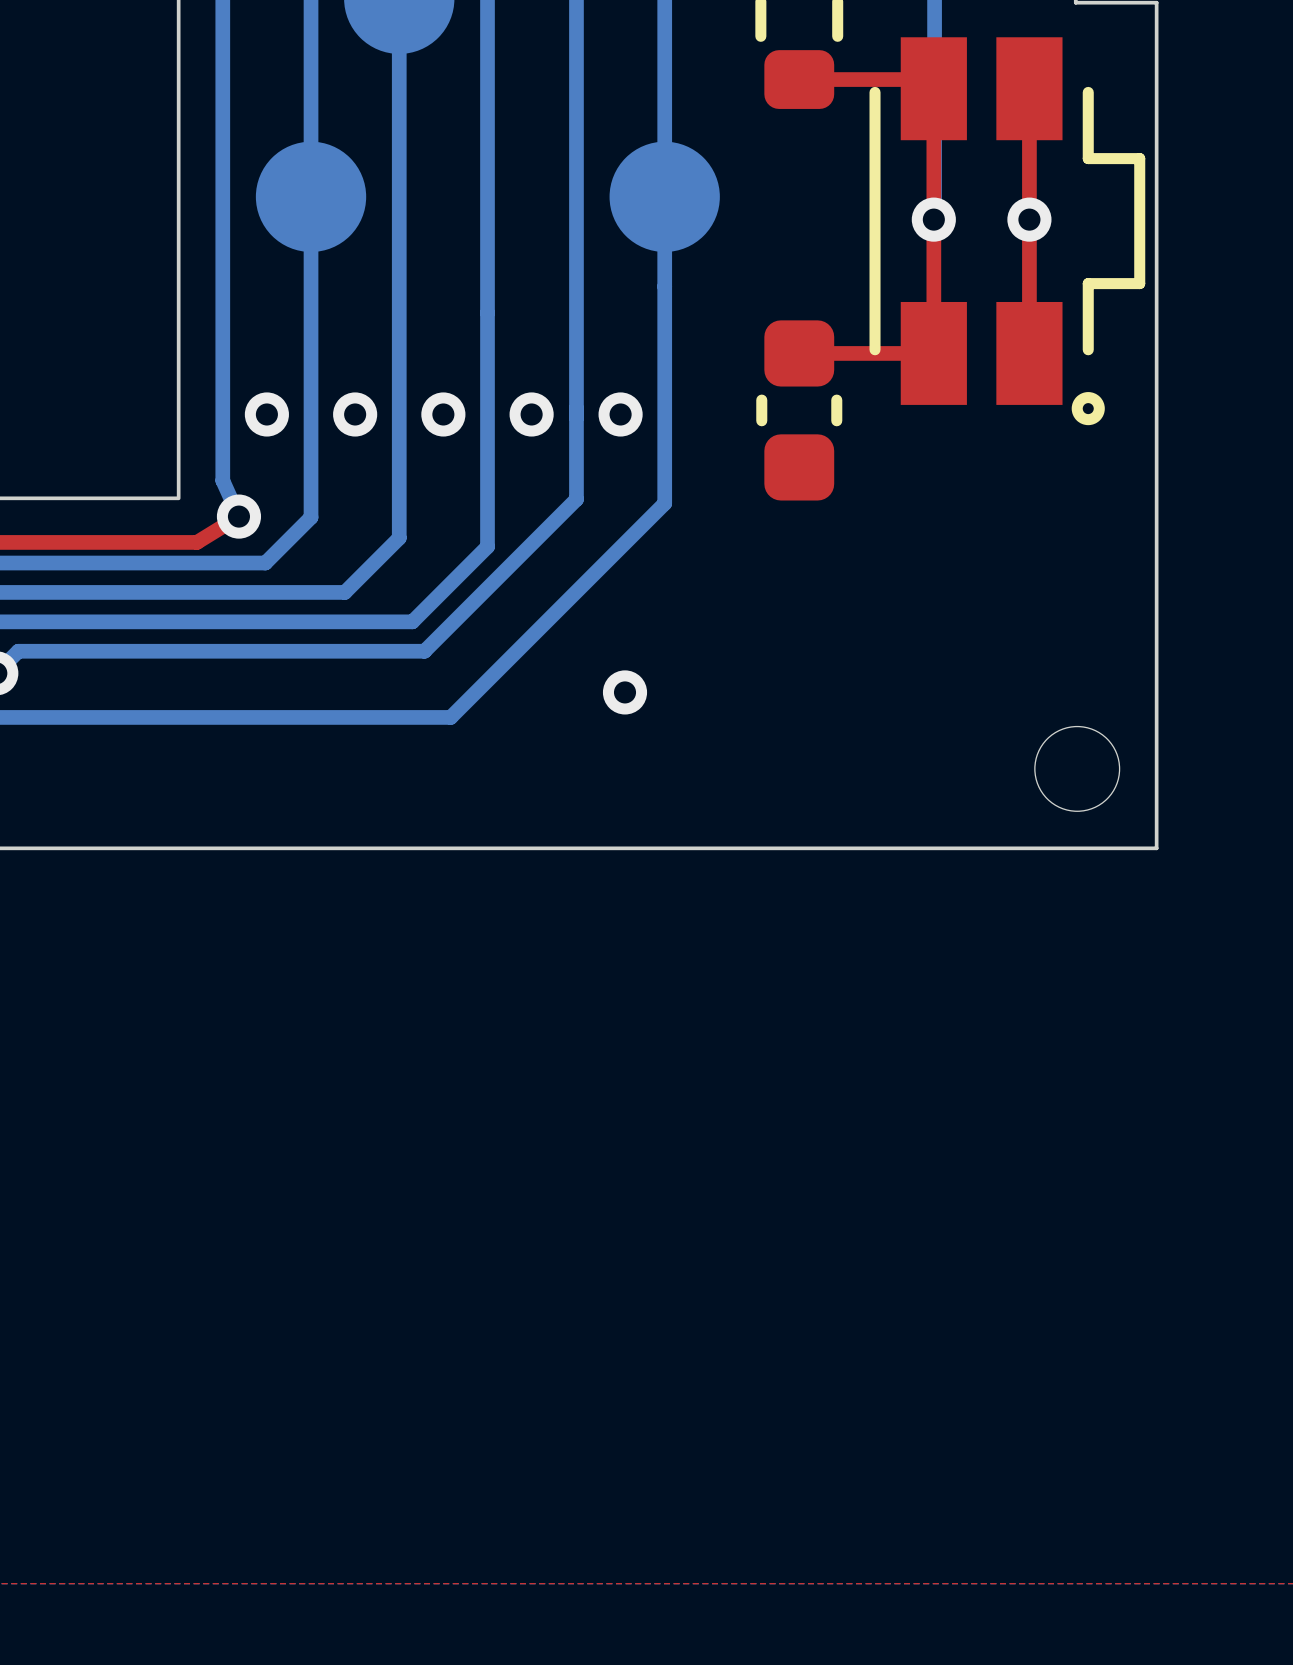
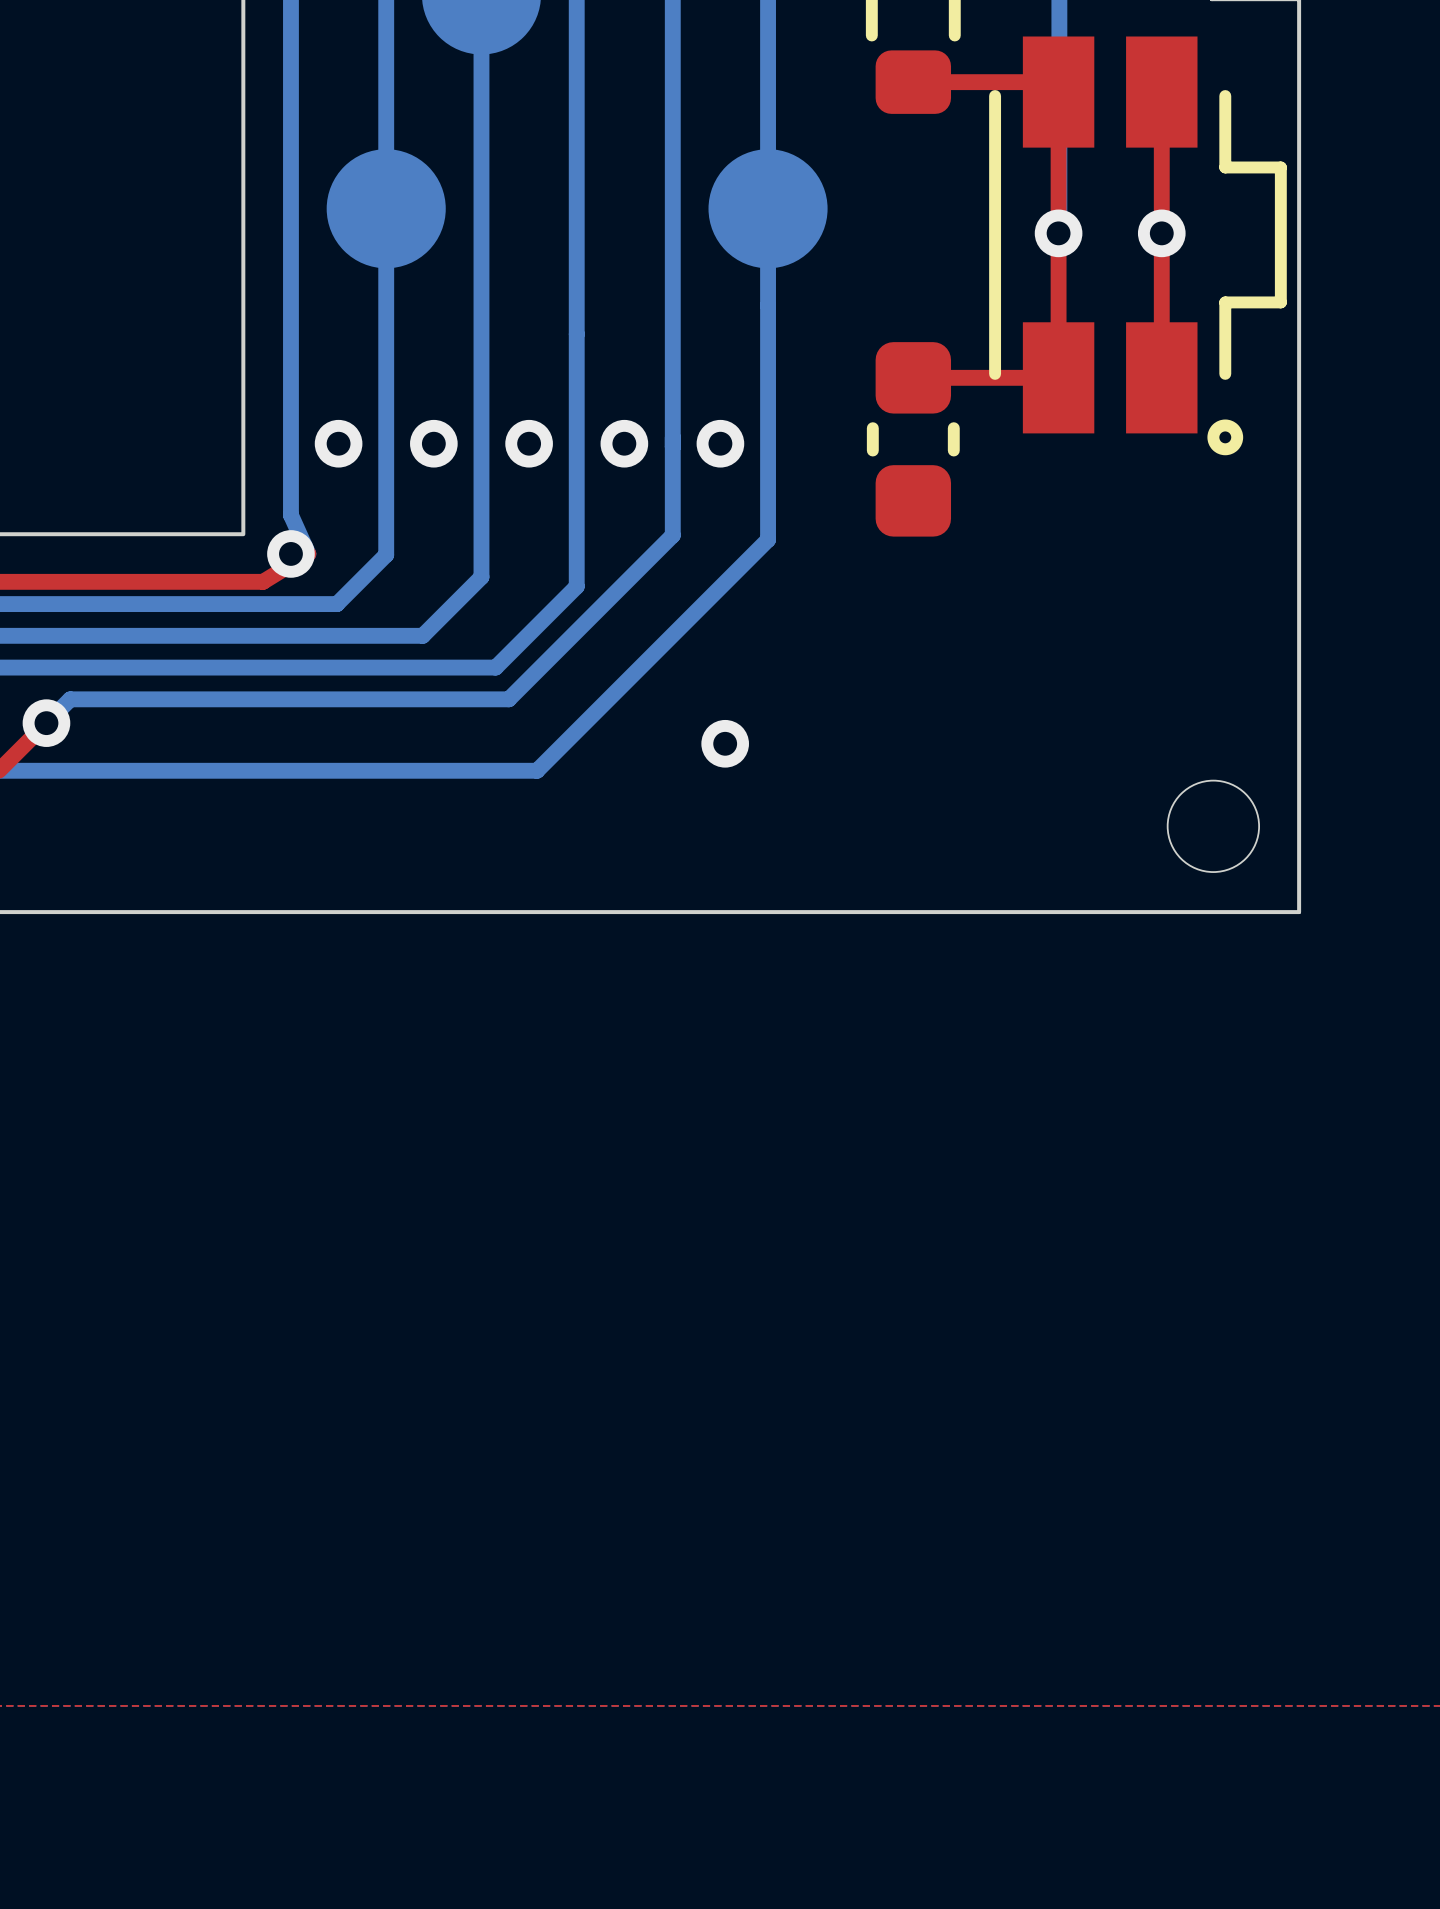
via position: (238, 516) -> (290, 553)

